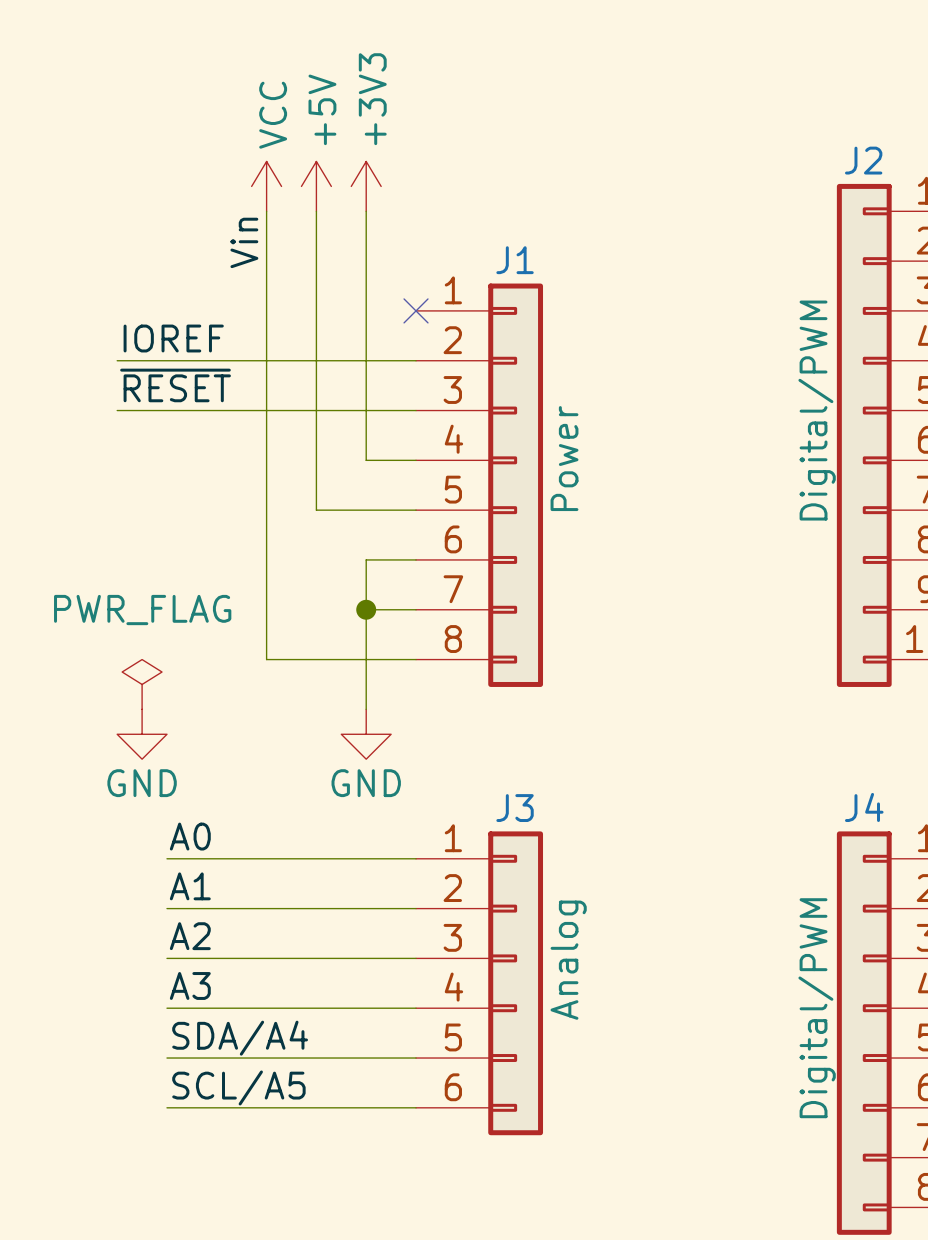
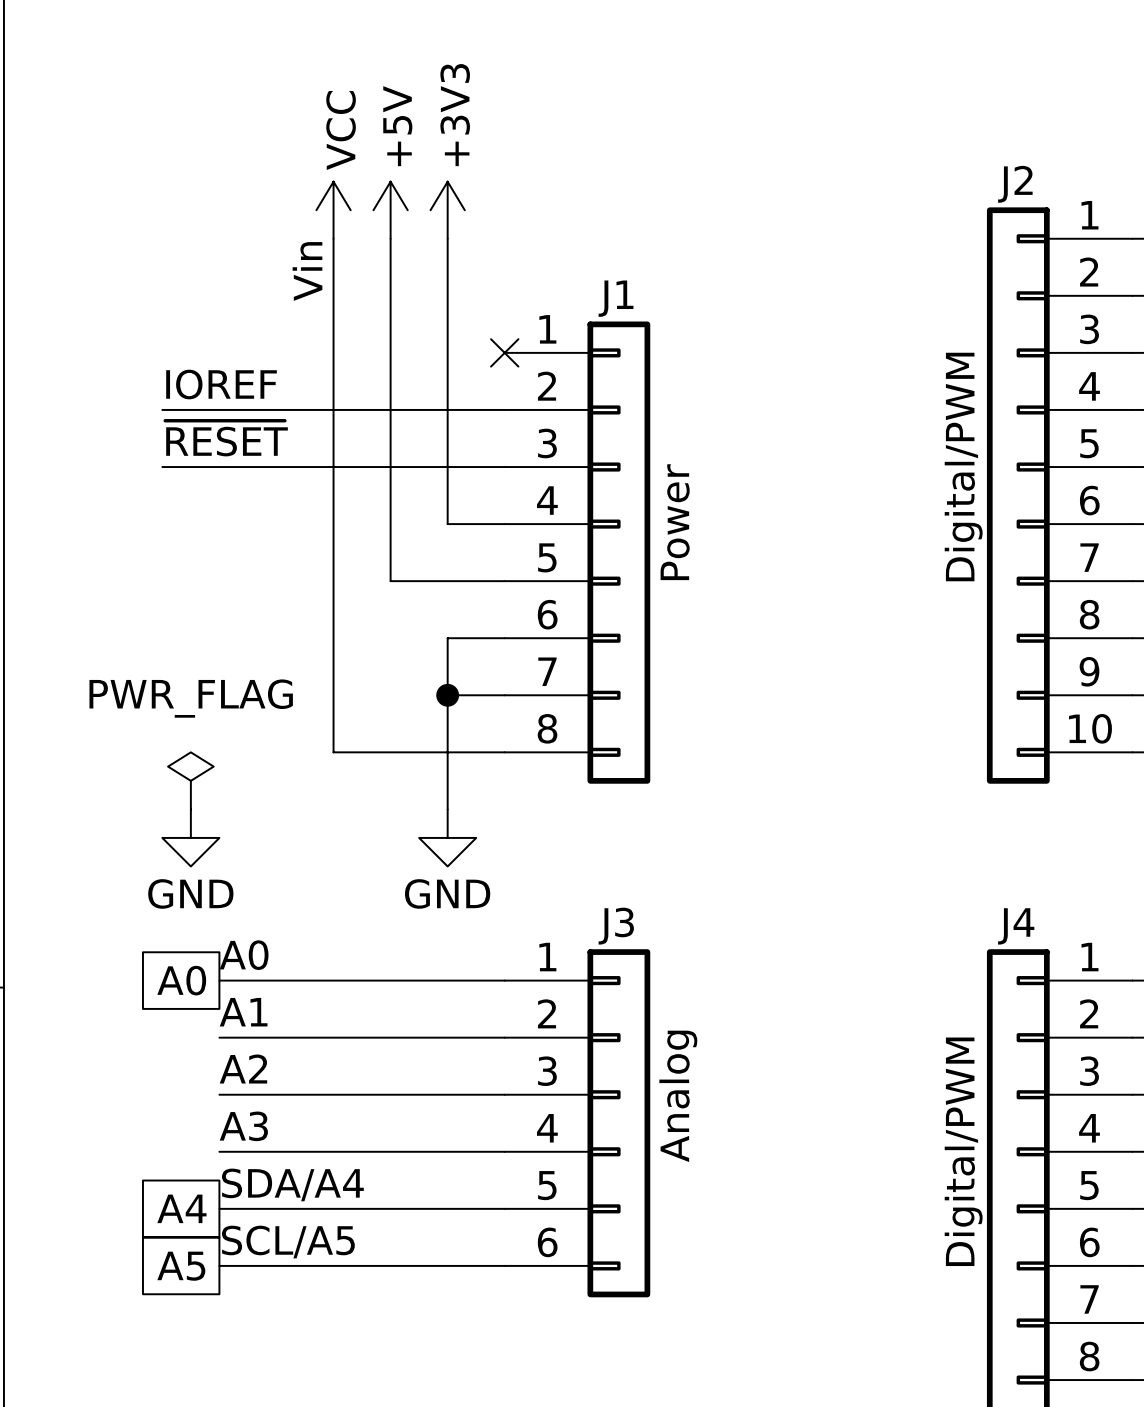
global label: none -> A0 (181, 980)
global label: none -> A4 (181, 1208)
global label: none -> A5 (181, 1266)

